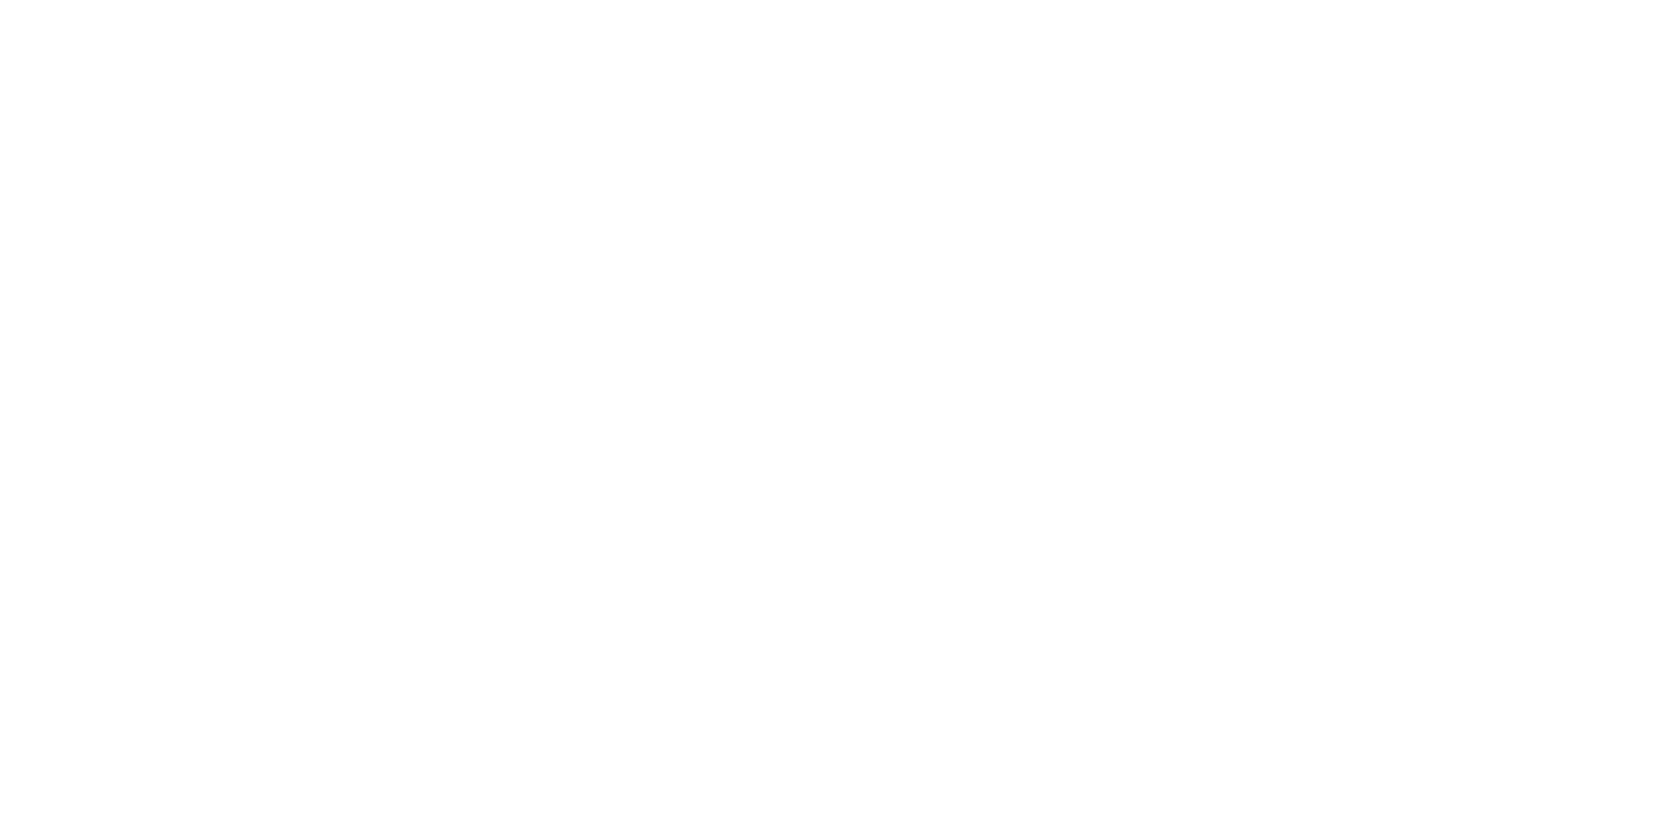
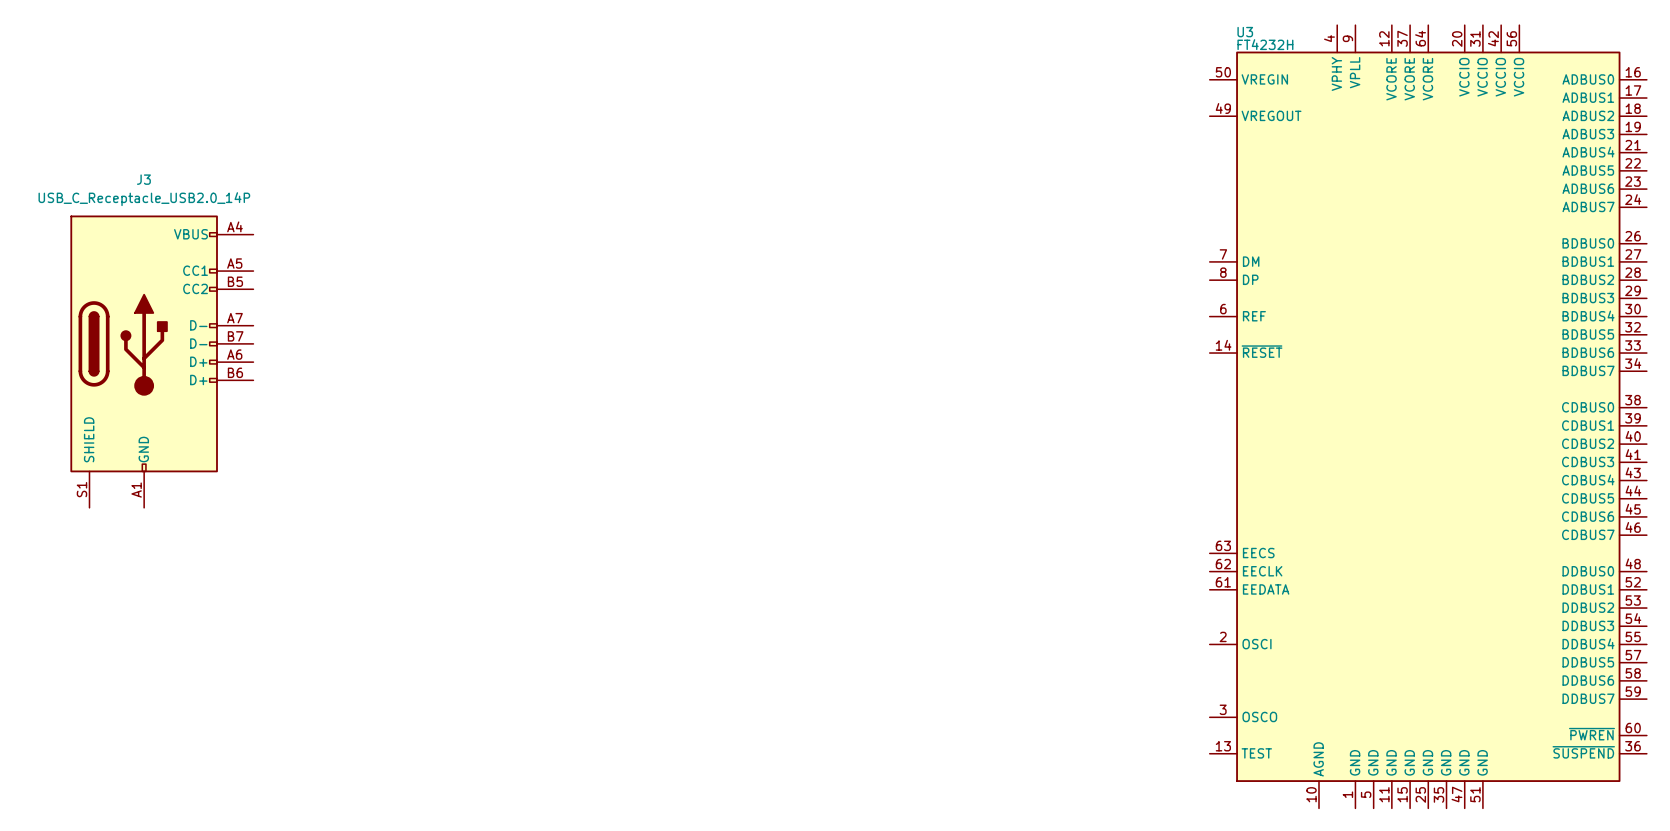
J3: none -> USB_C_Receptacle_USB2.0_14P (161, 361)
U3: none -> FT4232H (1428, 416)

